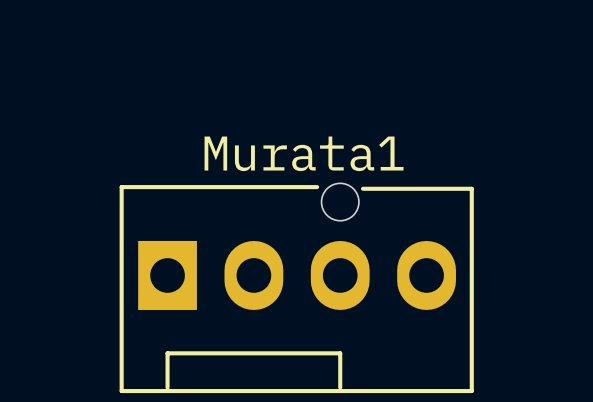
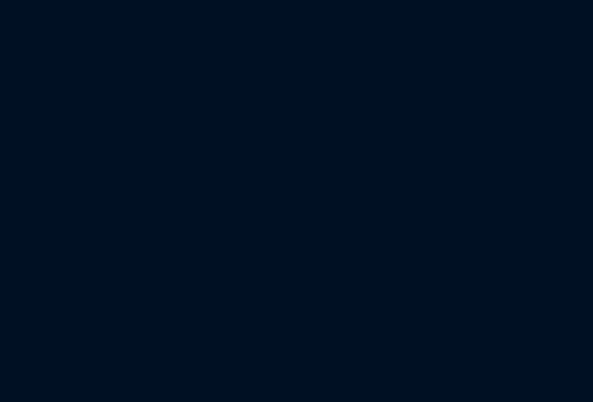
Murata1: (296, 288) -> none

